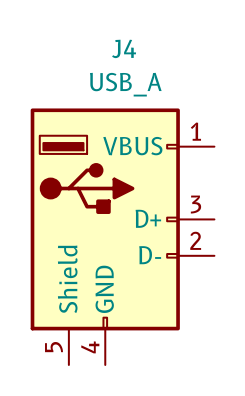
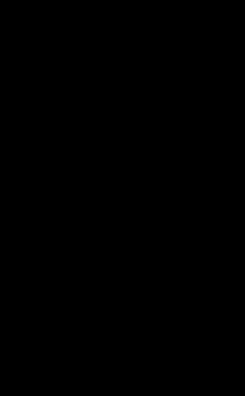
J4: USB_A (122, 236) -> none

